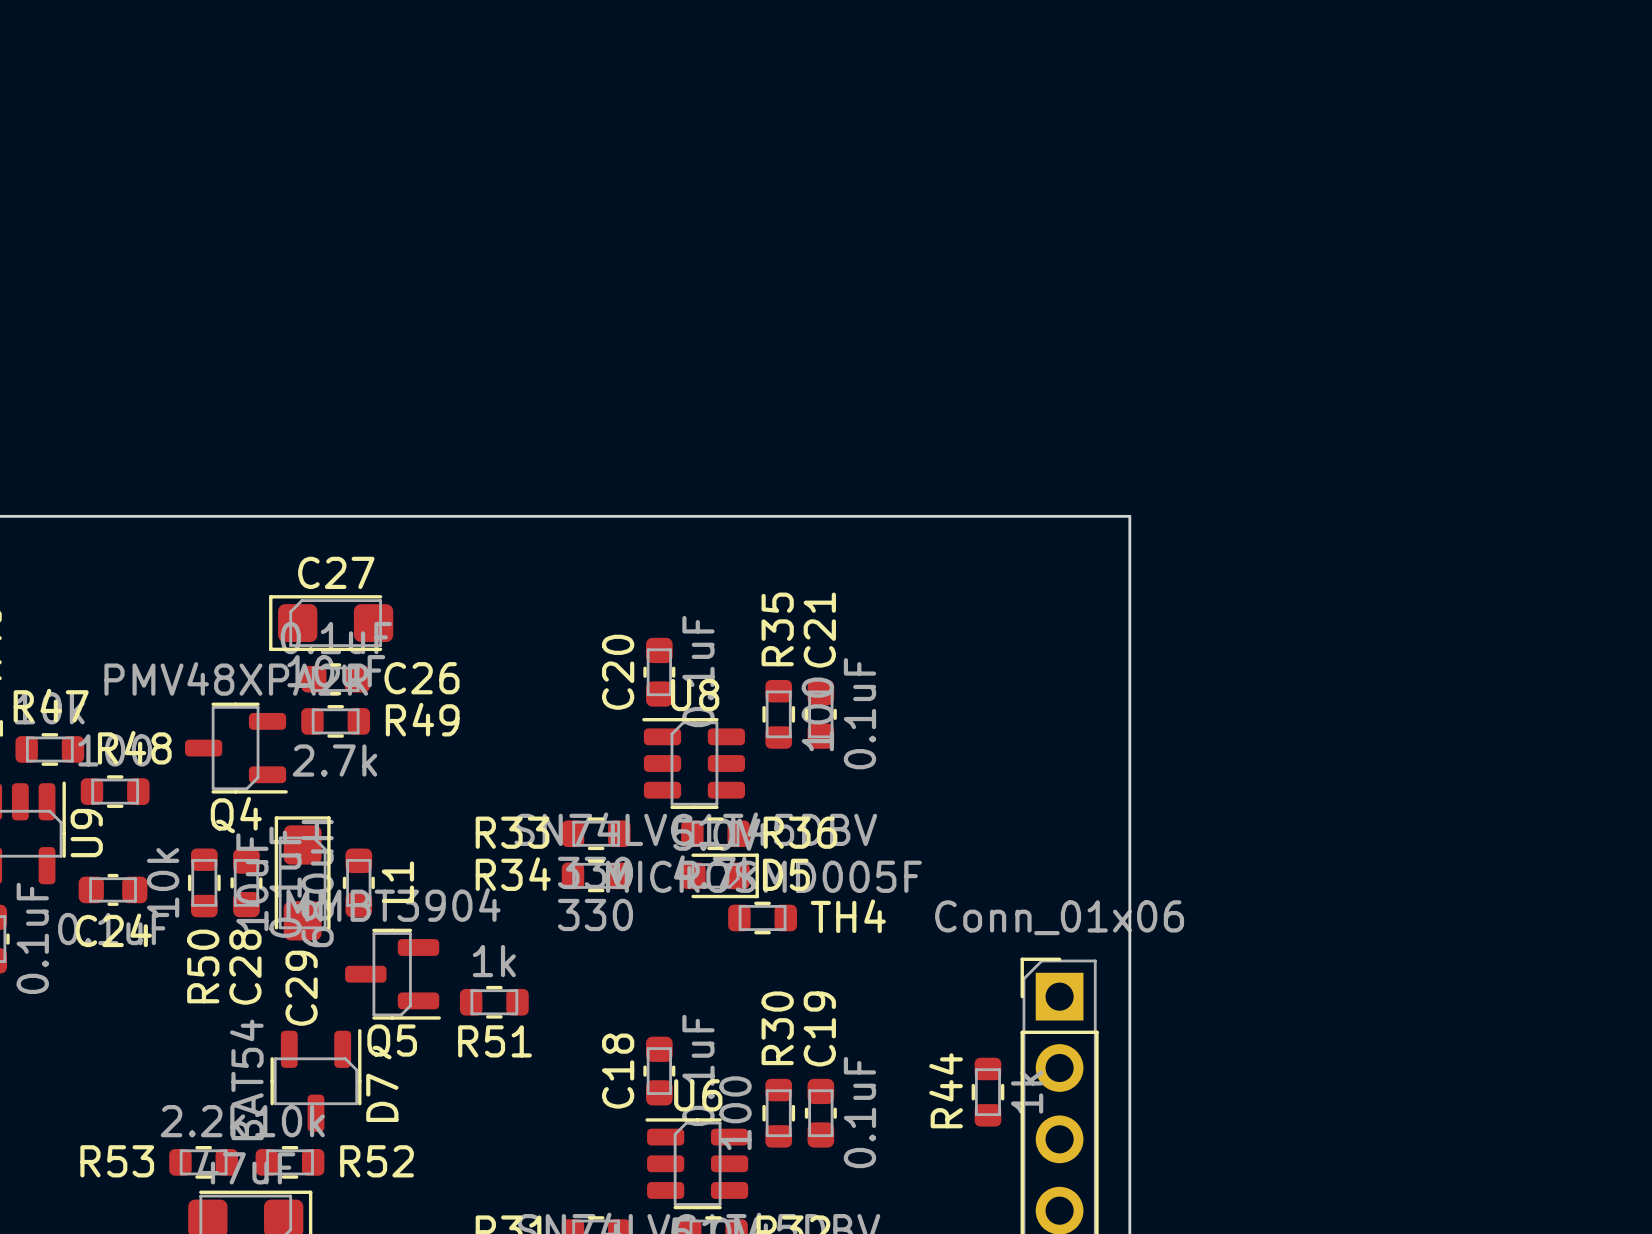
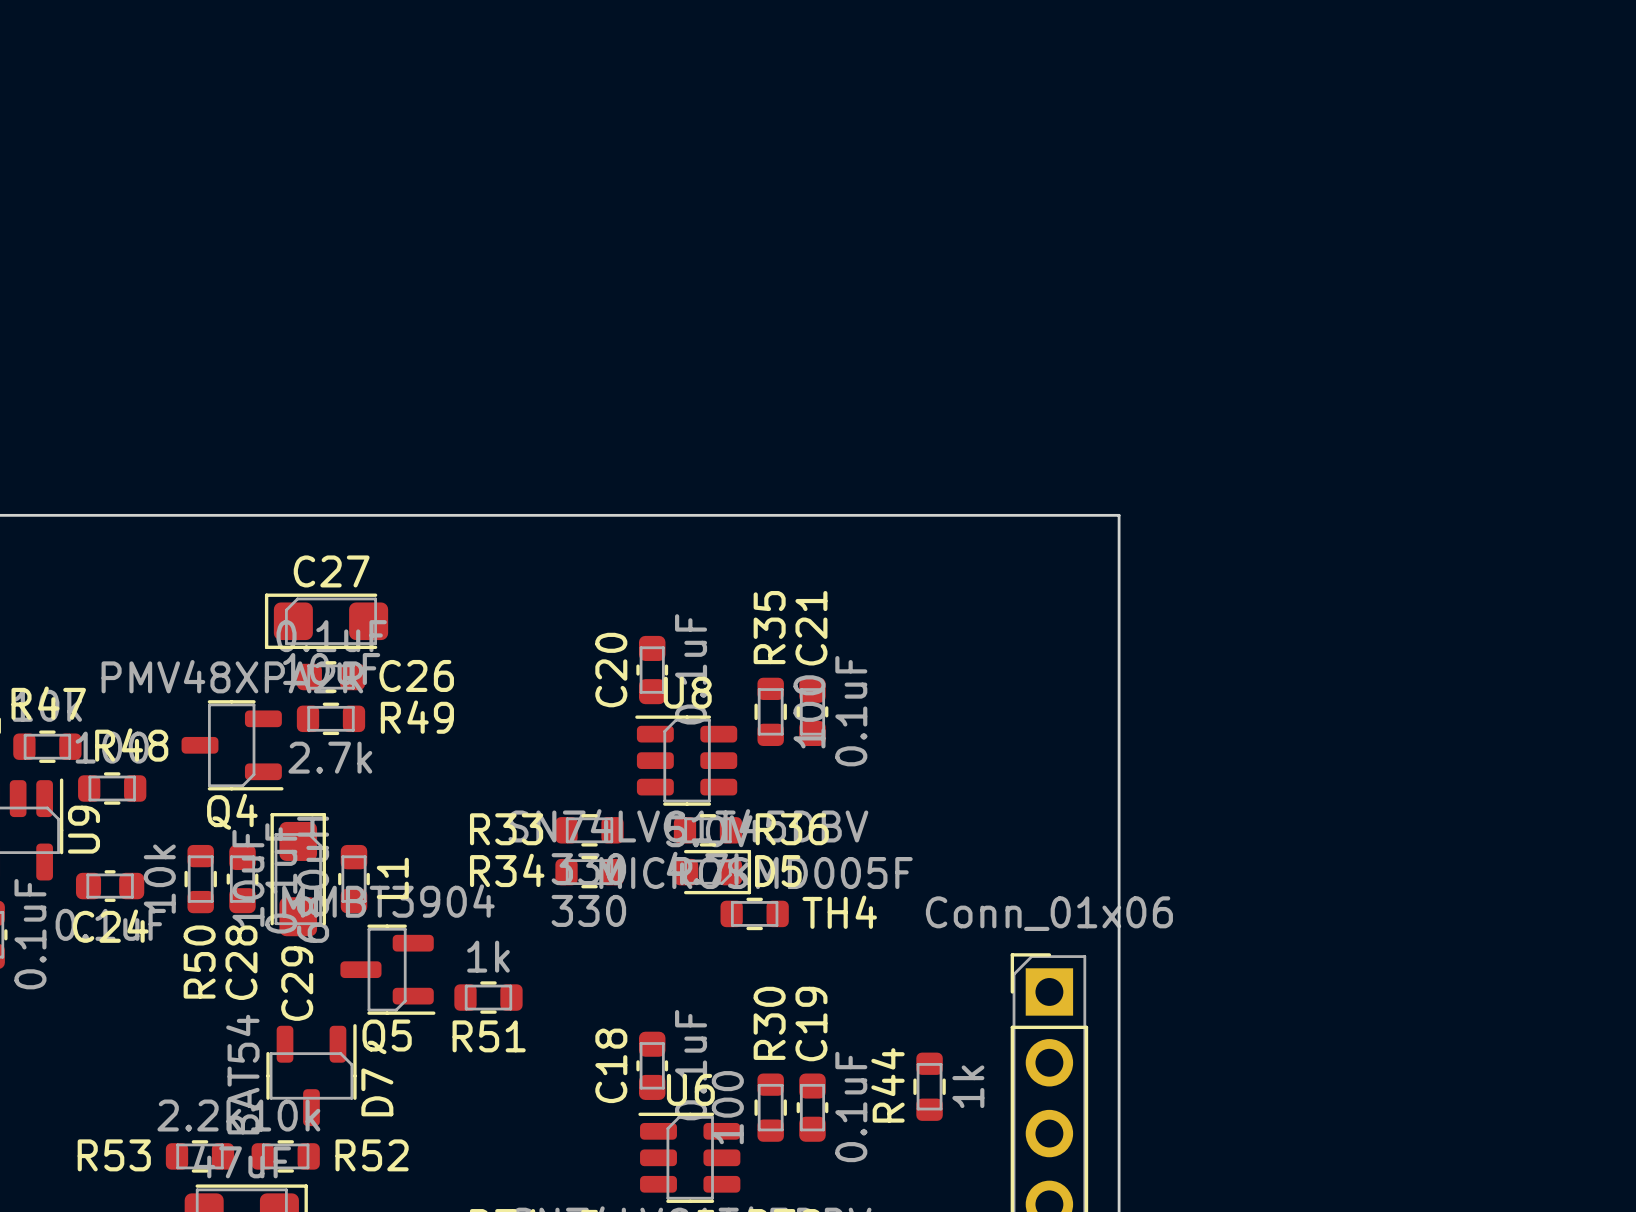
R44 position: (987, 1092) -> (929, 1086)

